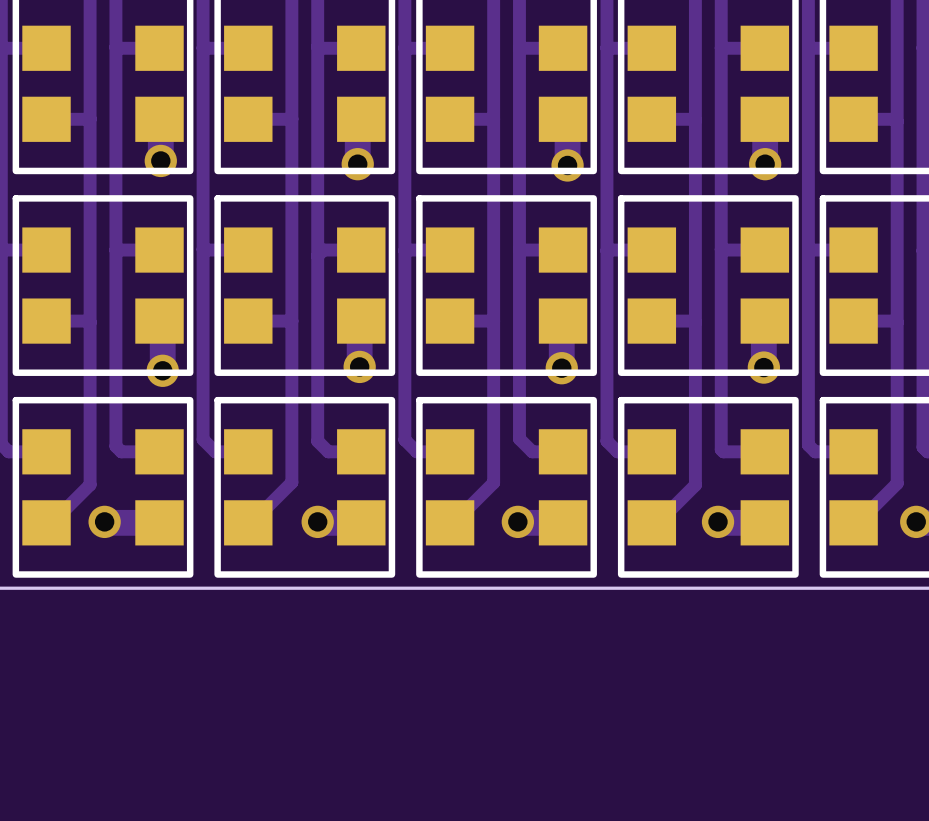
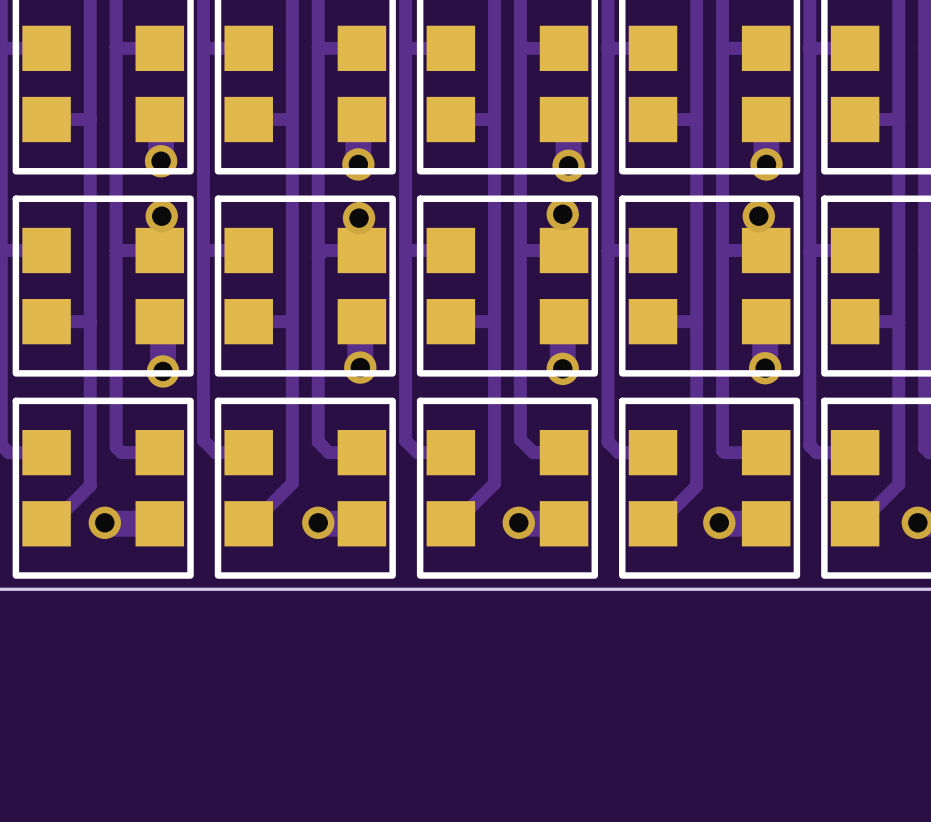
via: none -> (562, 214)
via: none -> (161, 216)
via: none -> (758, 216)
via: none -> (359, 218)

